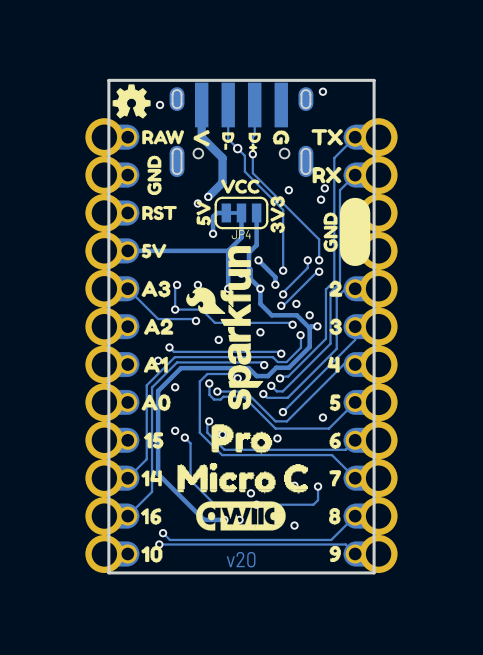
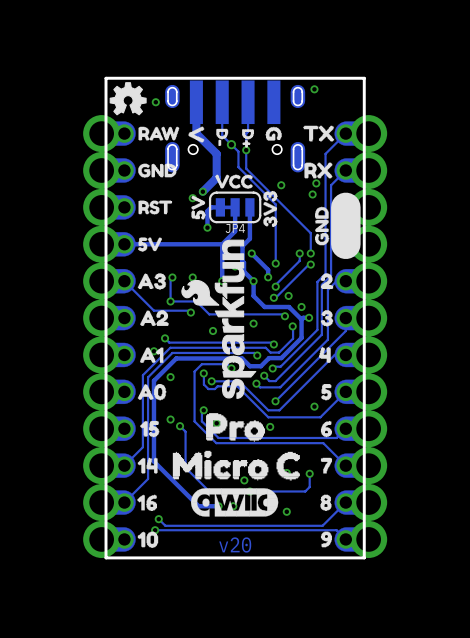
drawing shape: [147, 155, 162, 196] -> [138, 163, 177, 178]

